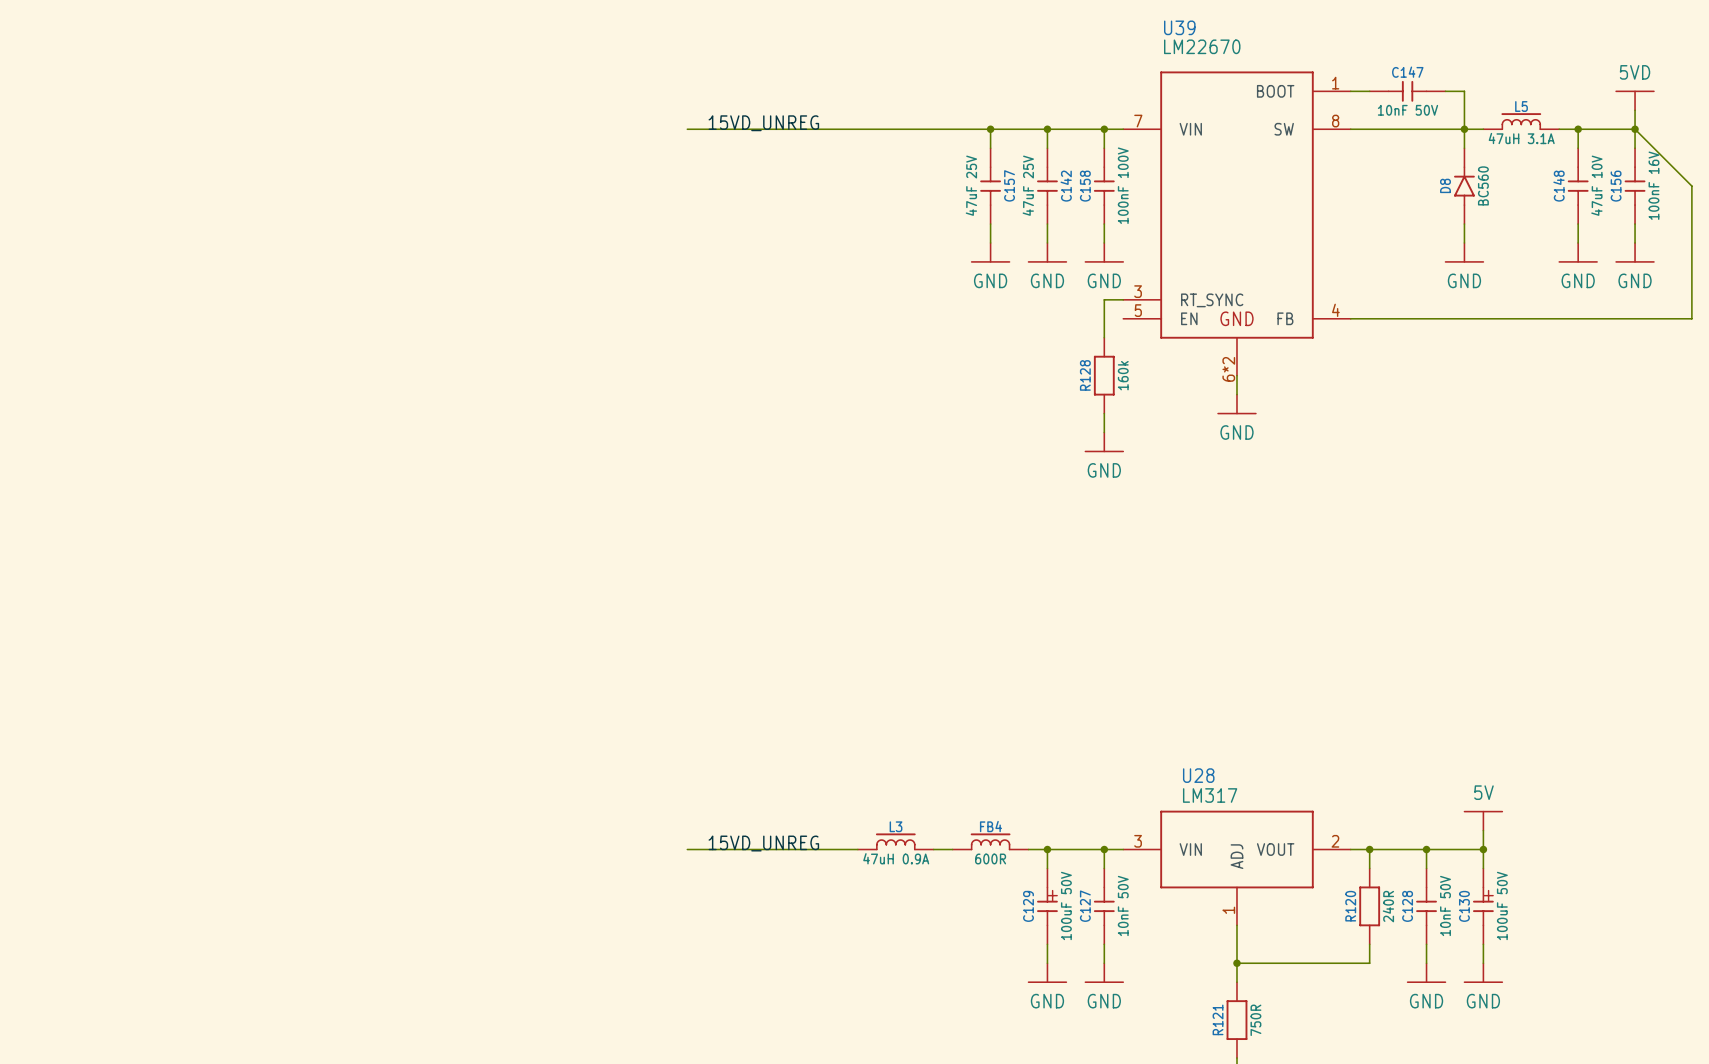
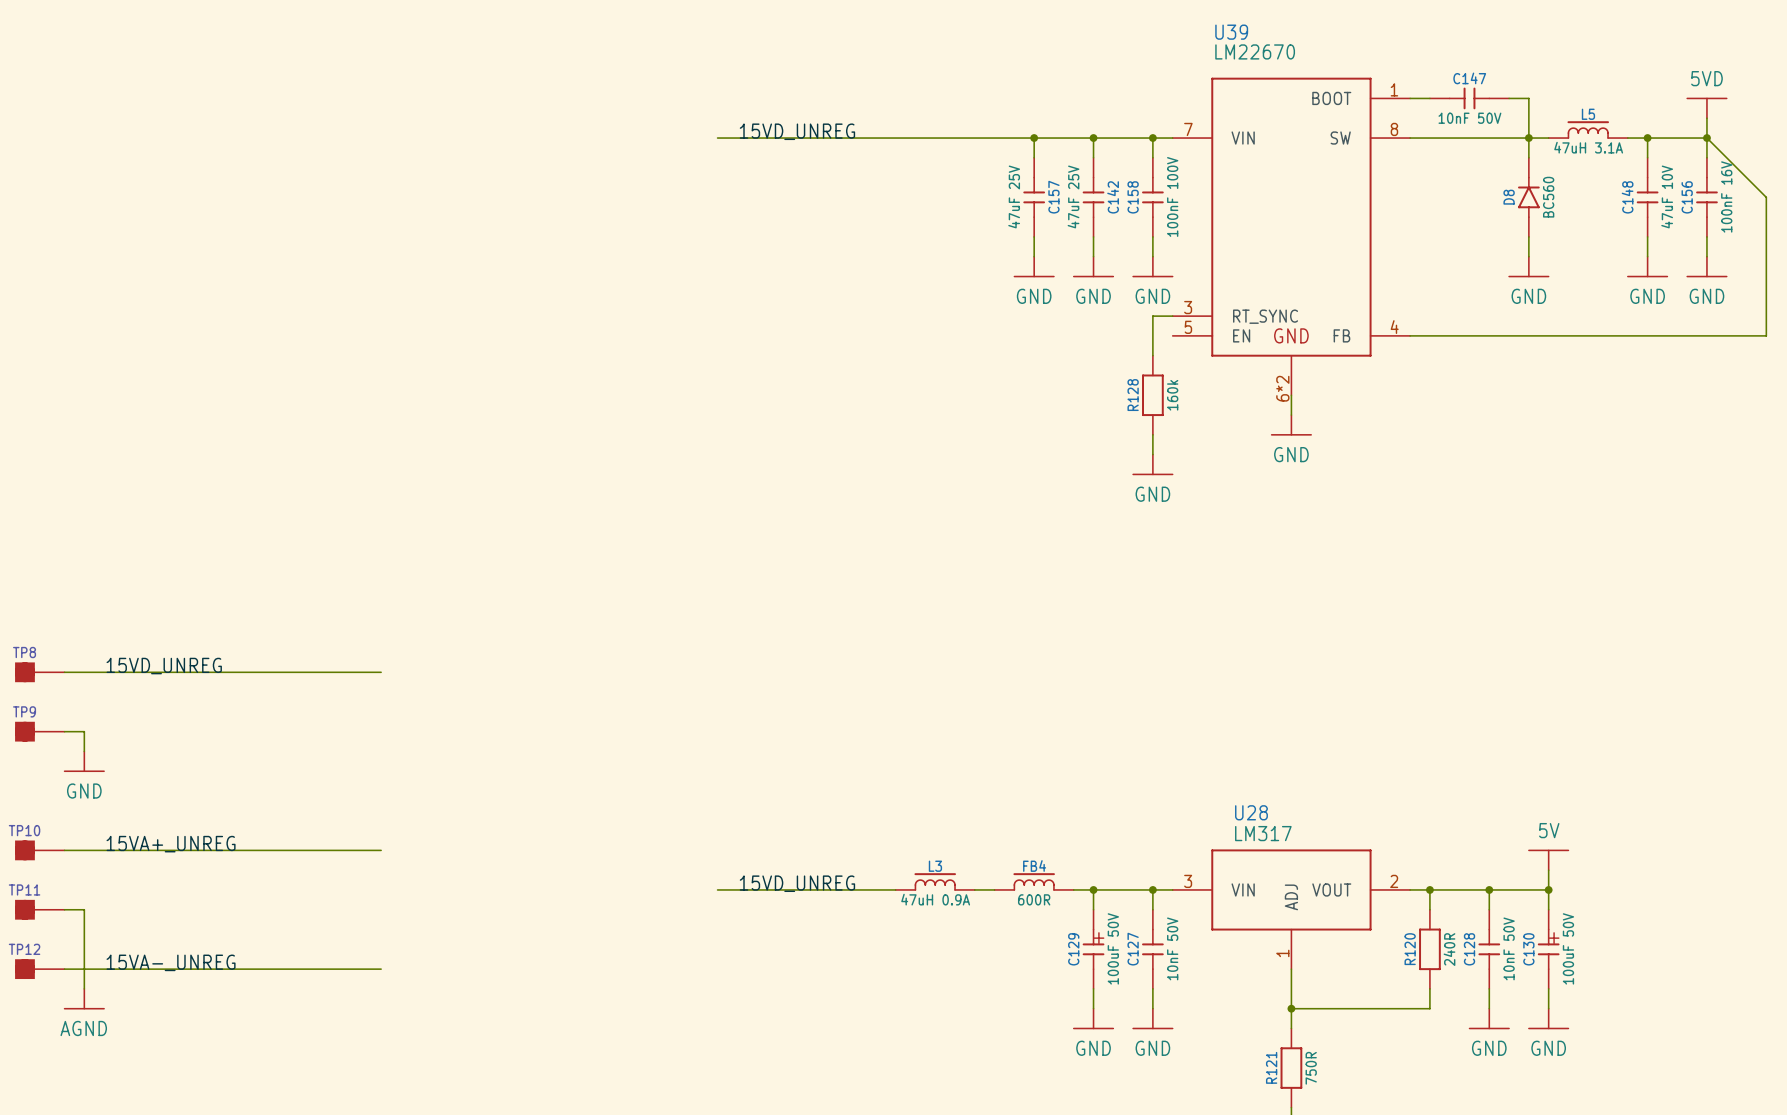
label: none -> 15VD_UNREG (164, 666)
TP8: none -> (39, 672)
wire: none -> (64, 672) (381, 672)
TP9: none -> (39, 731)
wire: none -> (64, 731) (84, 731) (84, 751)
power symbol: none -> GND (84, 761)
label: none -> 15VA+_UNREG (171, 844)
TP10: none -> (39, 850)
wire: none -> (64, 850) (381, 850)
TP11: none -> (39, 909)
wire: none -> (64, 909) (84, 909) (84, 988)
label: none -> 15VA-_UNREG (171, 962)
TP12: none -> (39, 969)
wire: none -> (64, 969) (381, 969)
power symbol: none -> AGND (84, 999)

